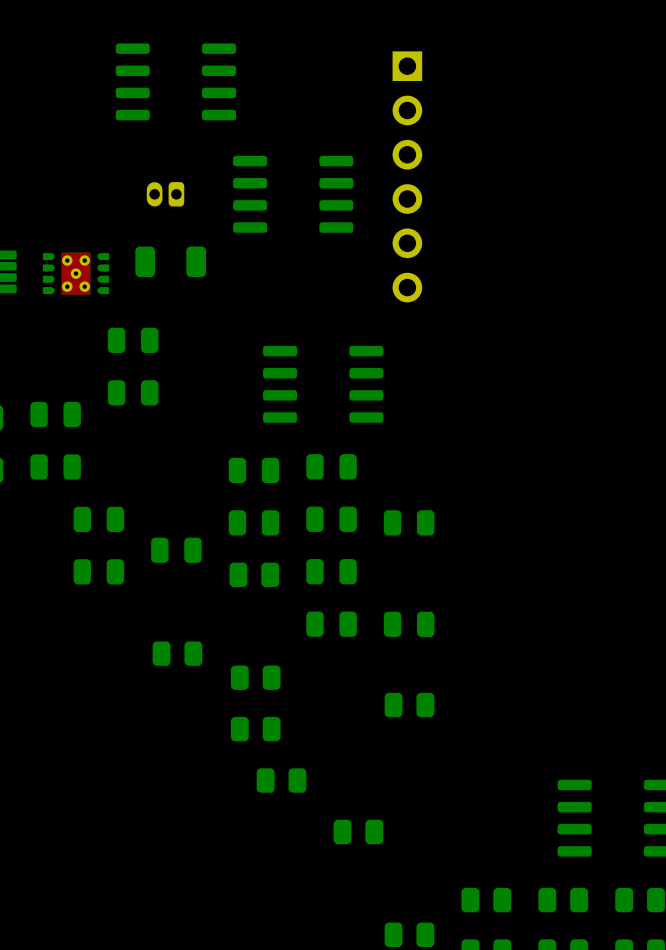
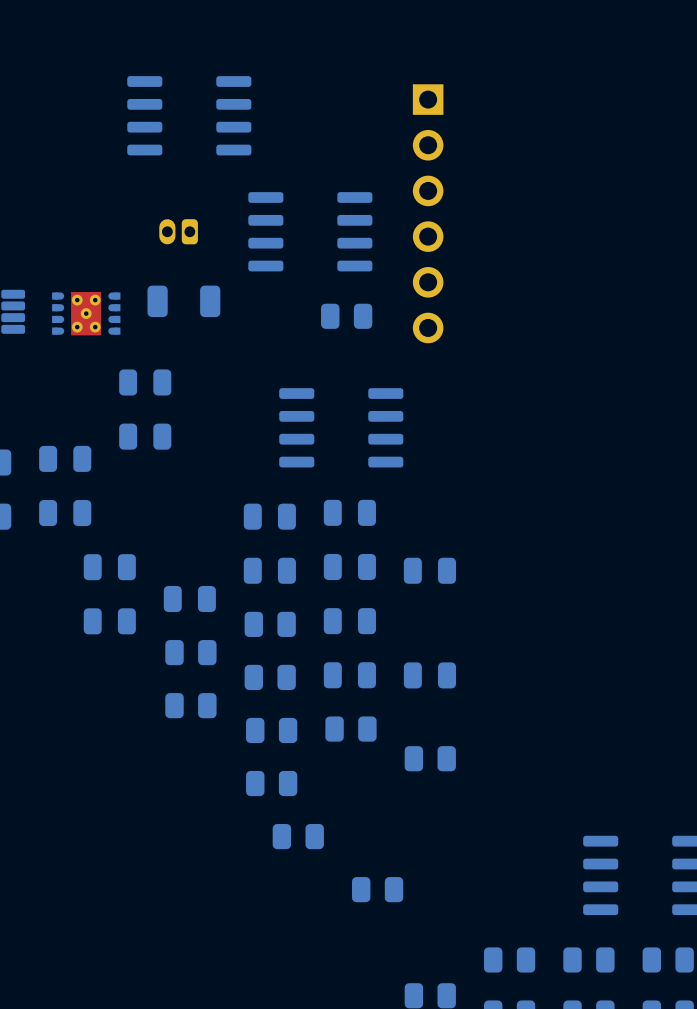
part: none -> (346, 316)
part: none -> (190, 652)
part: none -> (270, 677)
part: none -> (350, 729)

